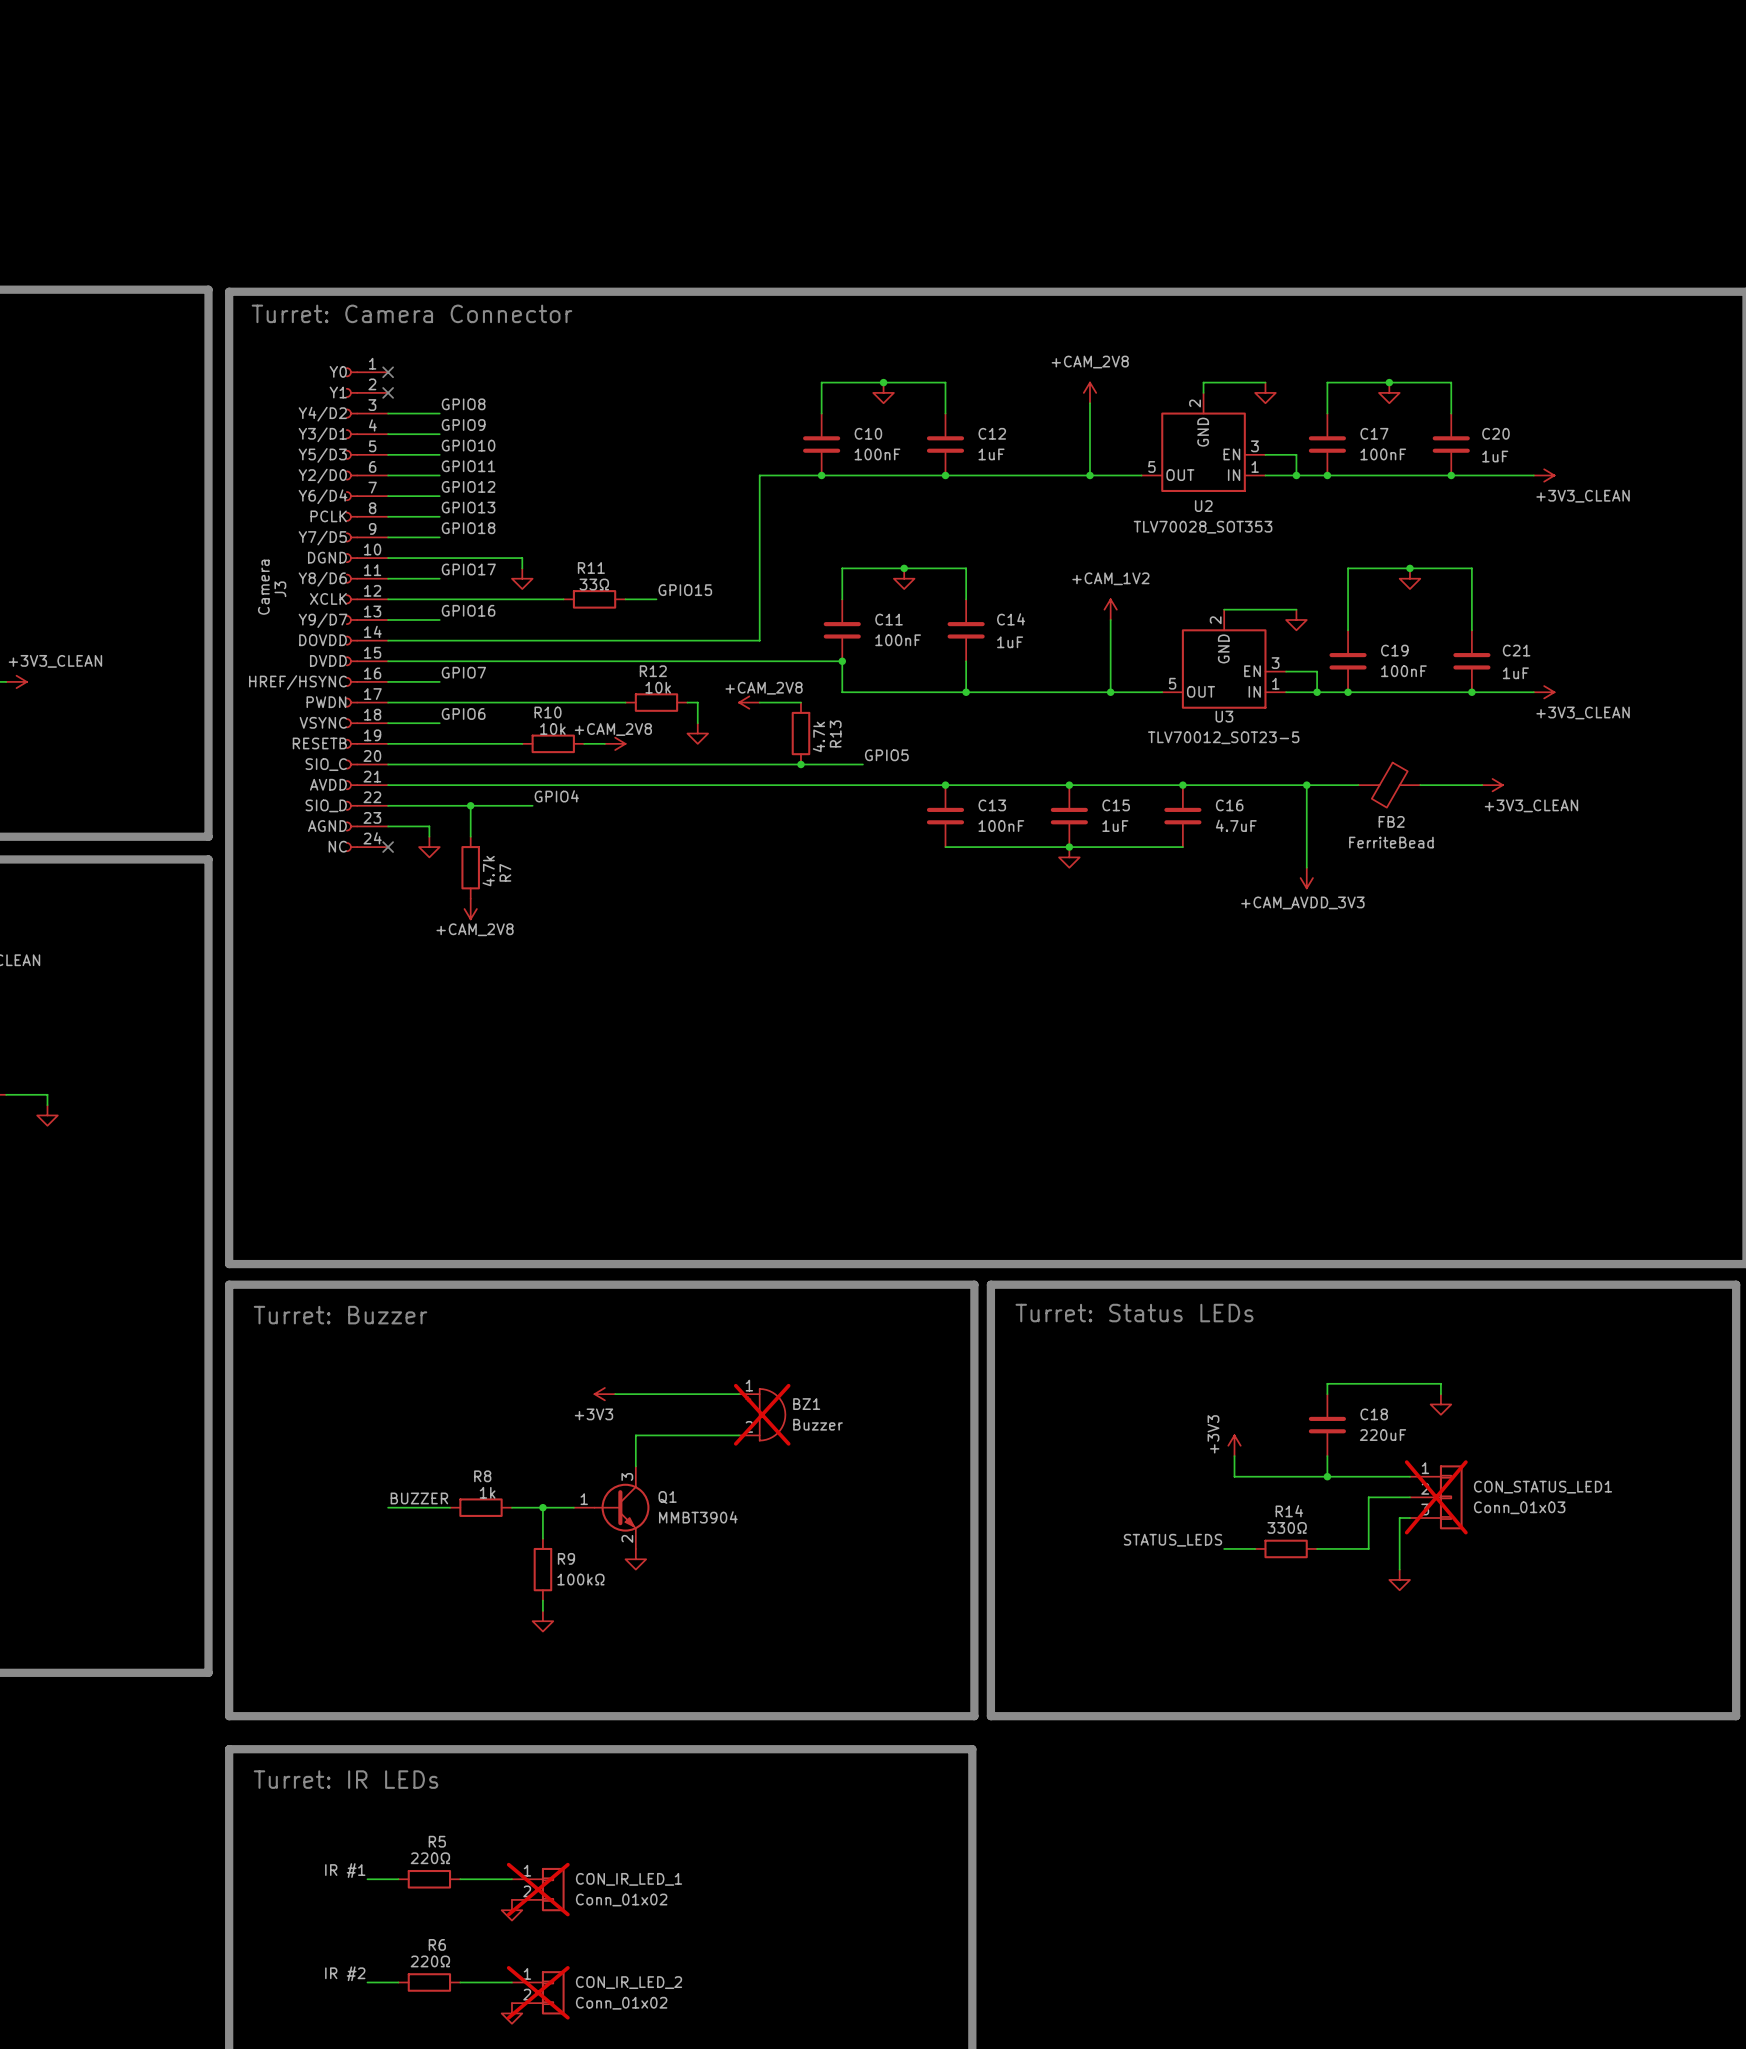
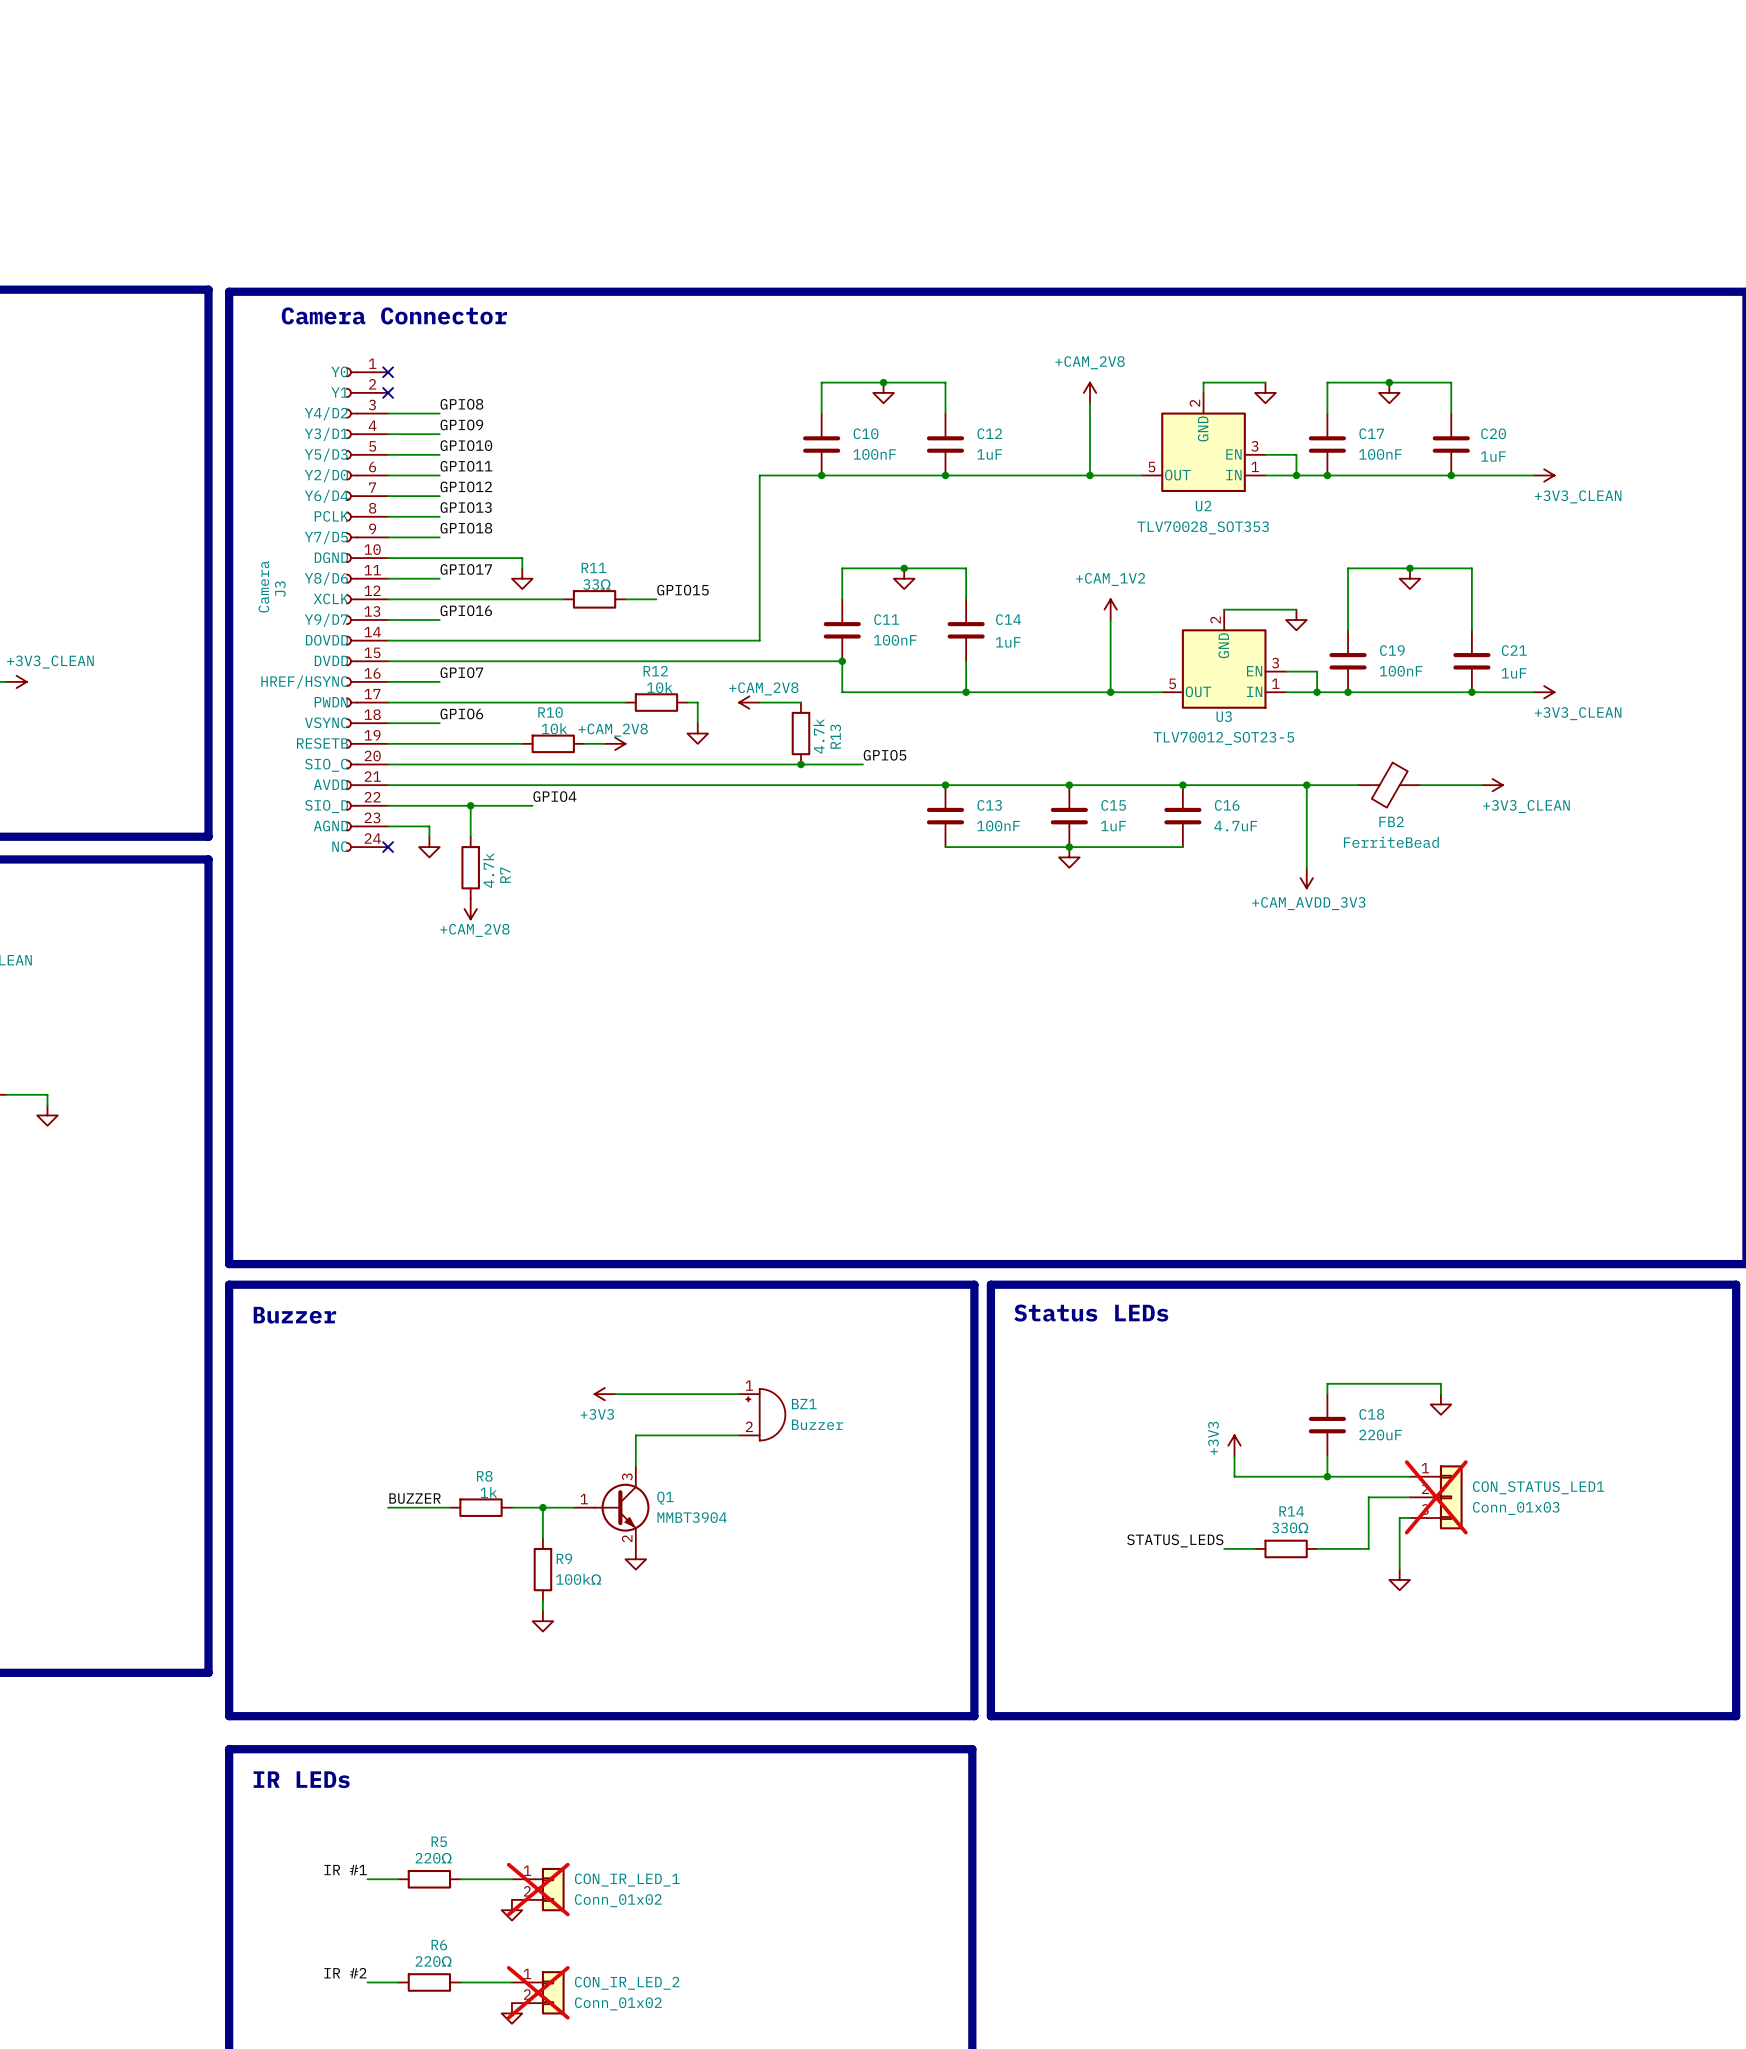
text: Turret: Camera Connector (411, 313) -> Camera Connector (394, 315)
text: Turret: Status LEDs (1134, 1313) -> Status LEDs (1091, 1313)
text: Turret: Buzzer (340, 1315) -> Buzzer (294, 1315)
BZ1 do-not-place cross: (762, 1414) -> none
text: Turret: IR LEDs (346, 1779) -> IR LEDs (301, 1779)

